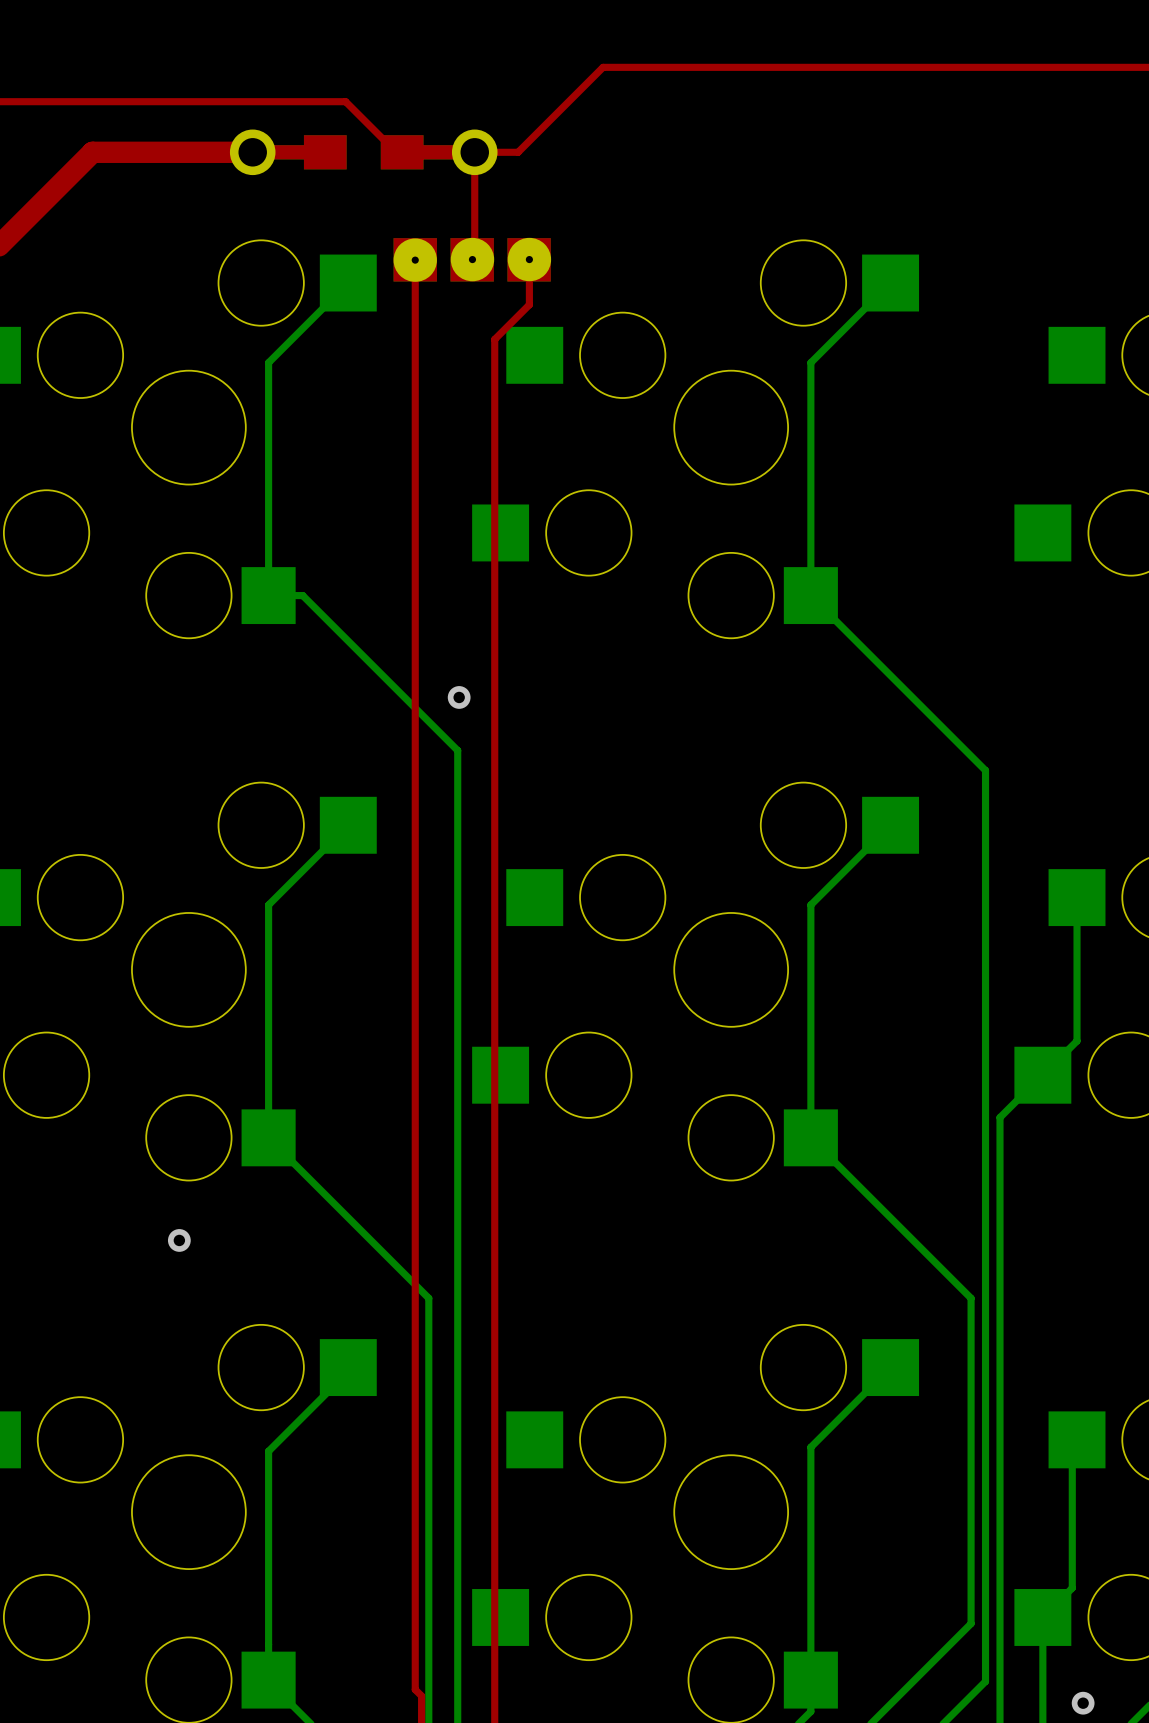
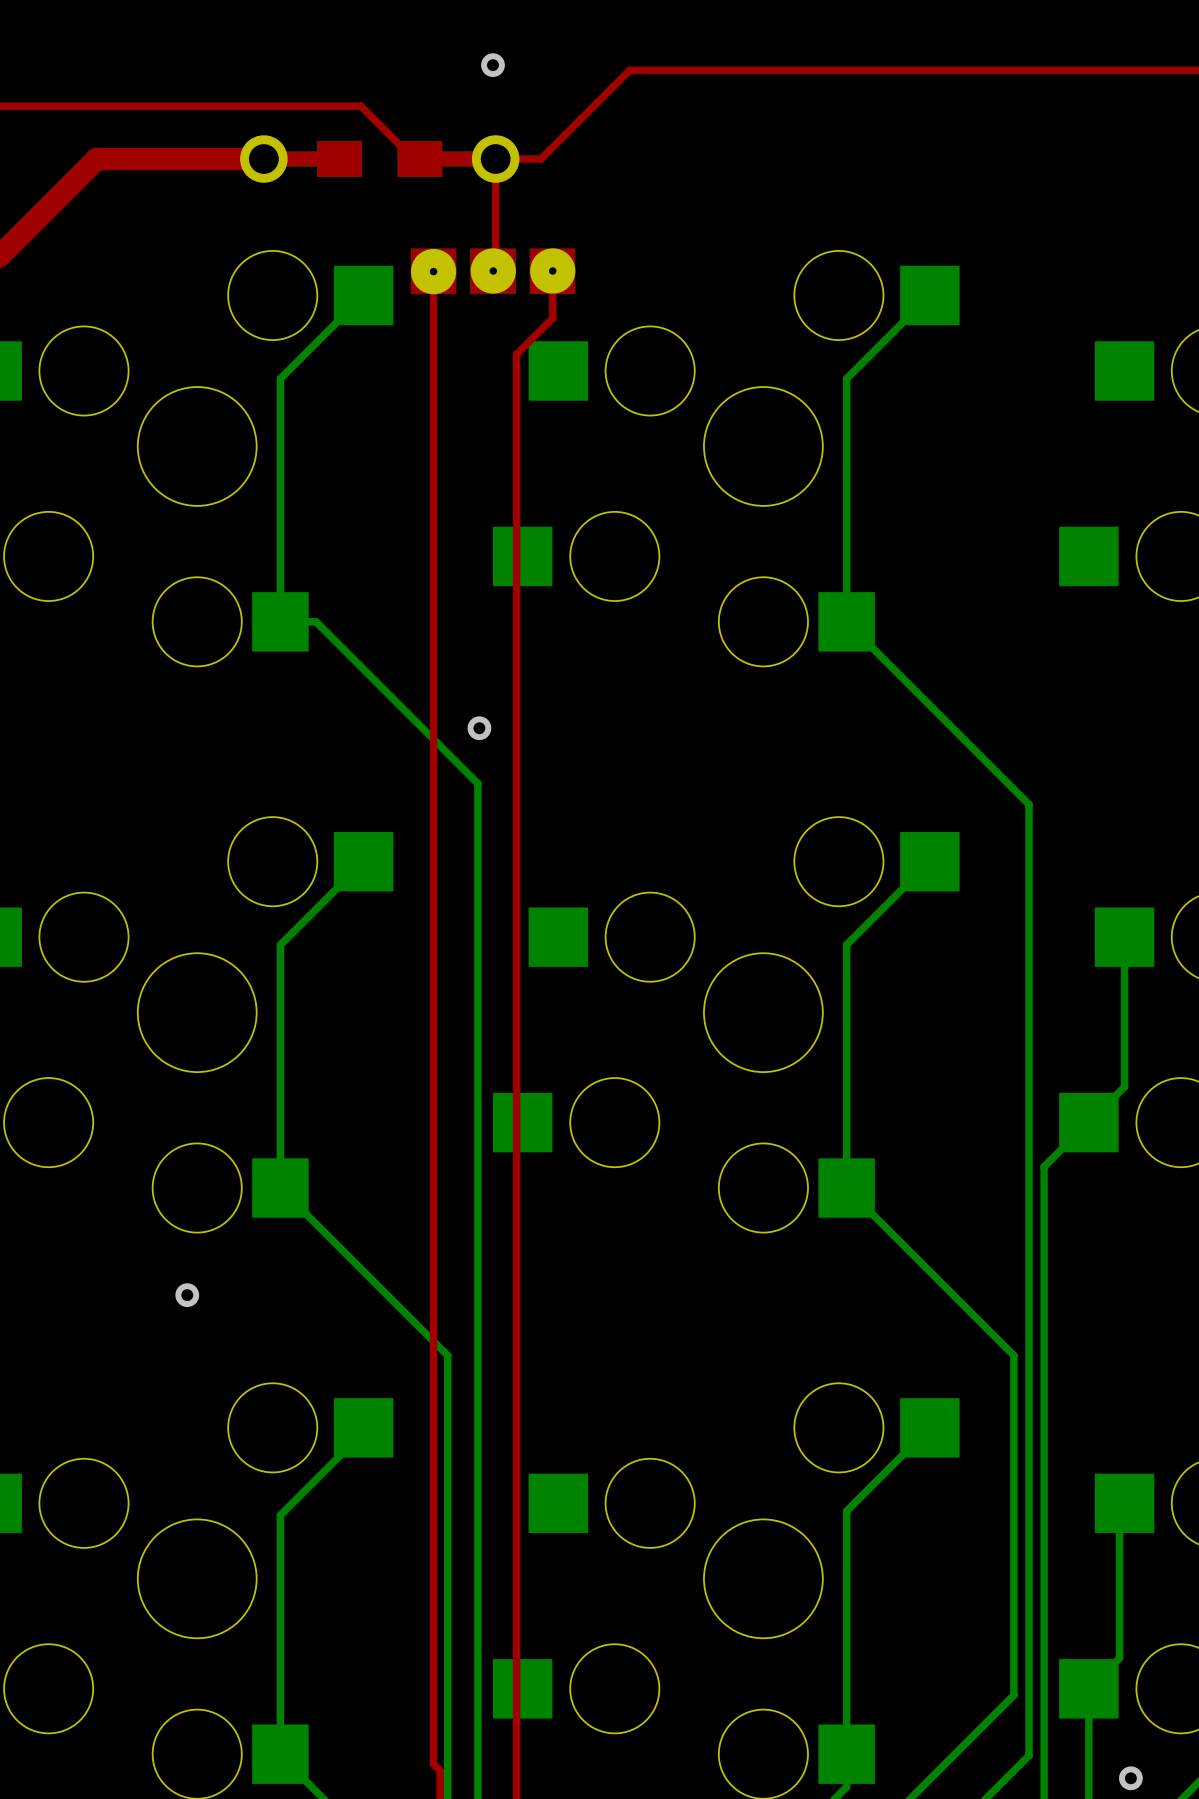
via: none -> (492, 65)

